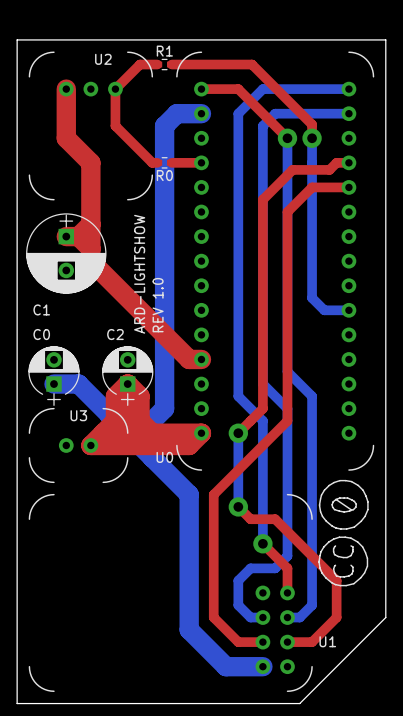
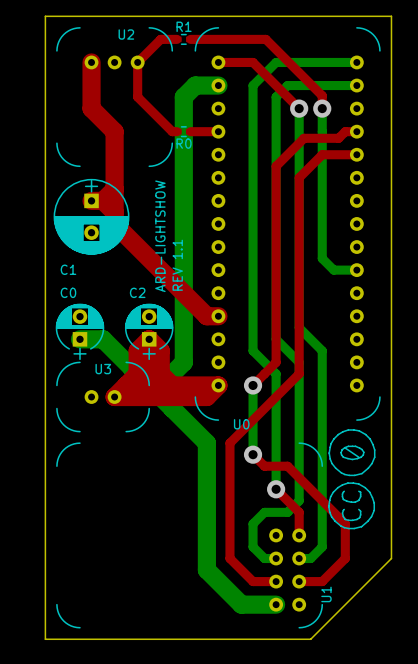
text: REV 1.0 (158, 305) -> REV 1.1 (177, 265)
U0 name position: U0 (164, 457) -> U0 (241, 424)
U1 name rotation: 0° (327, 641) -> 90° counterclockwise (326, 594)

